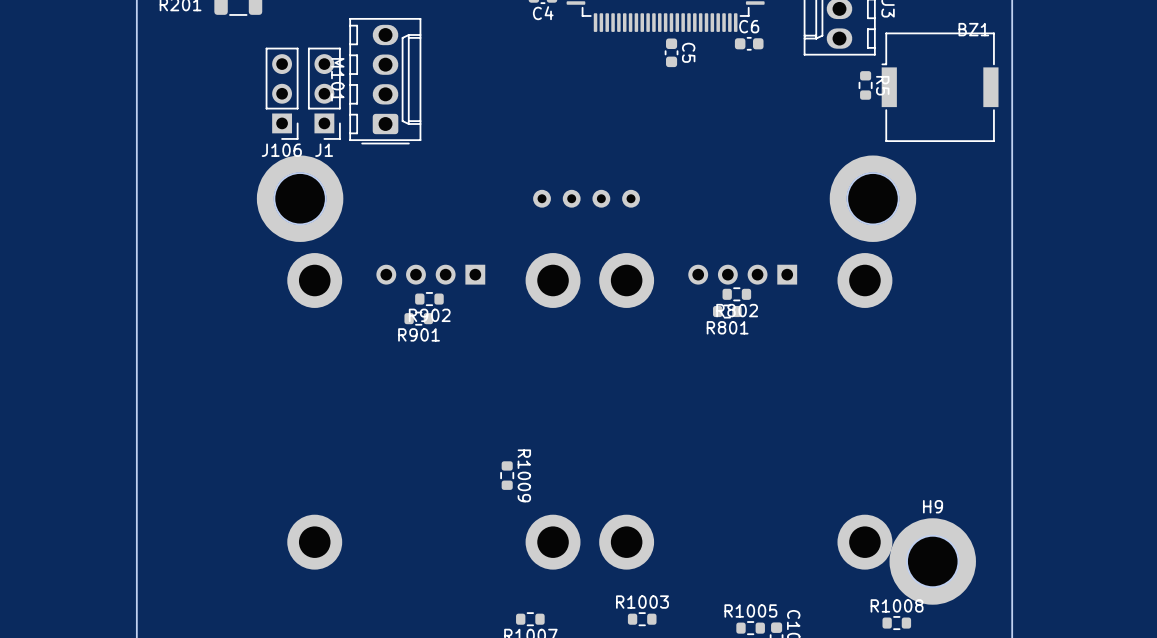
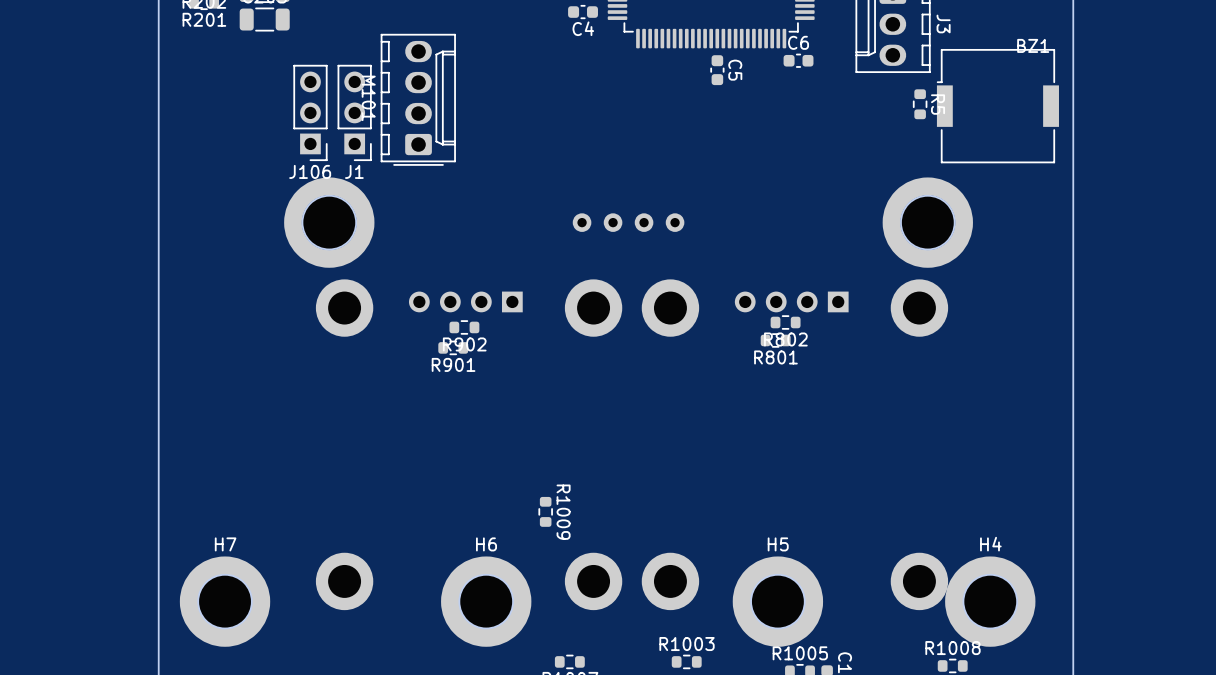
H9 name: H9 (933, 506) -> H4 (990, 544)
H7: none -> (225, 601)
H6: none -> (486, 601)
H5: none -> (777, 601)

